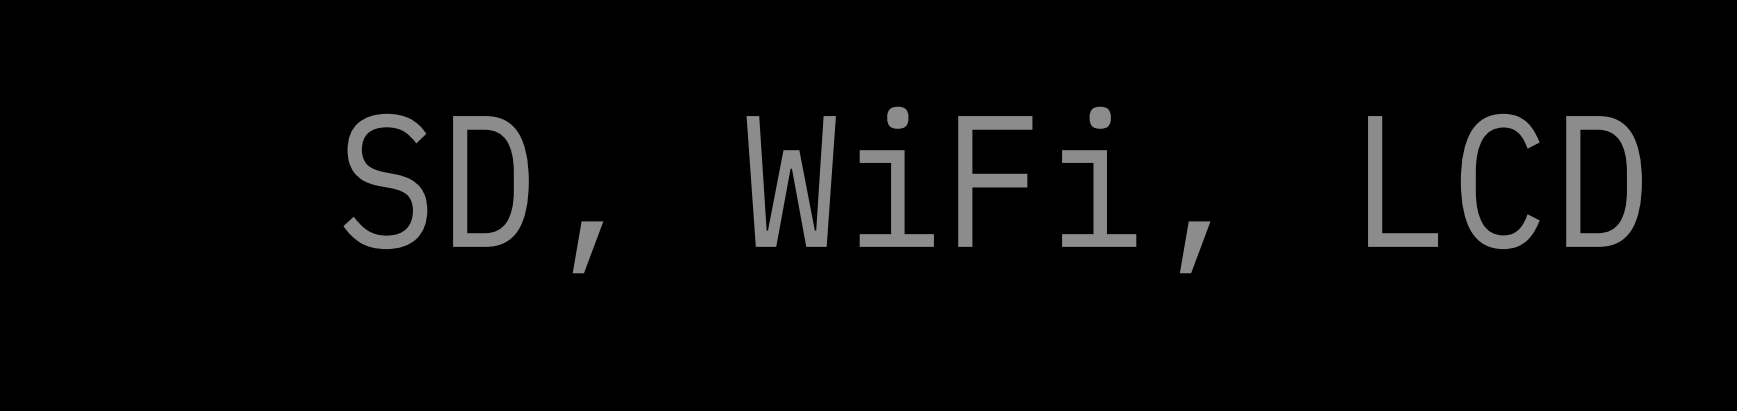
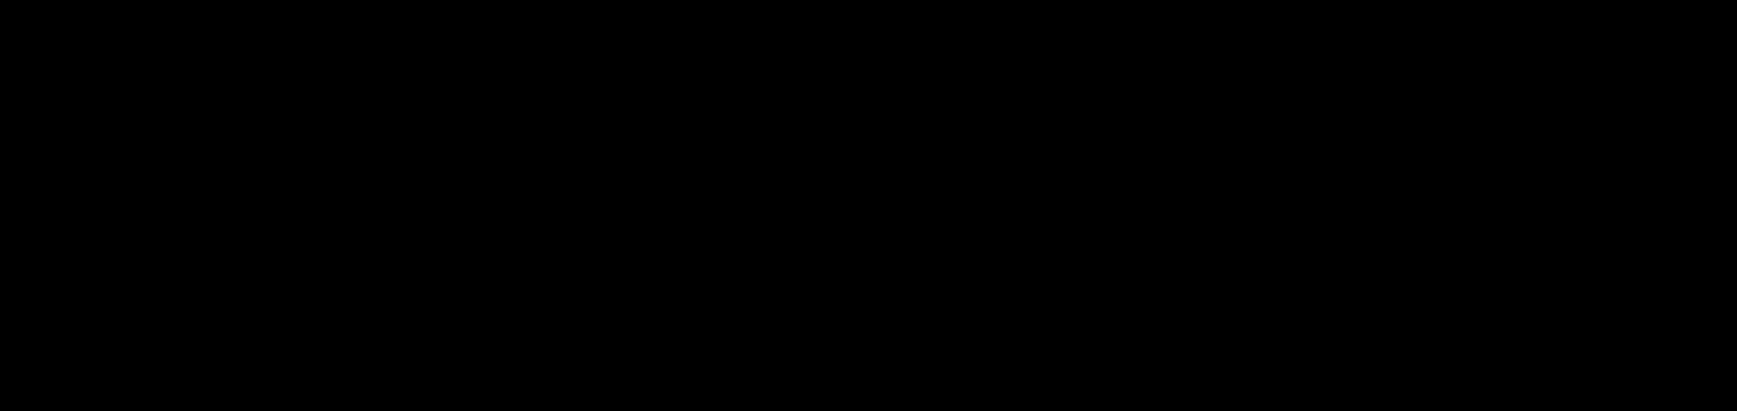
text: SD, WiFi, LCD (992, 189) -> none

